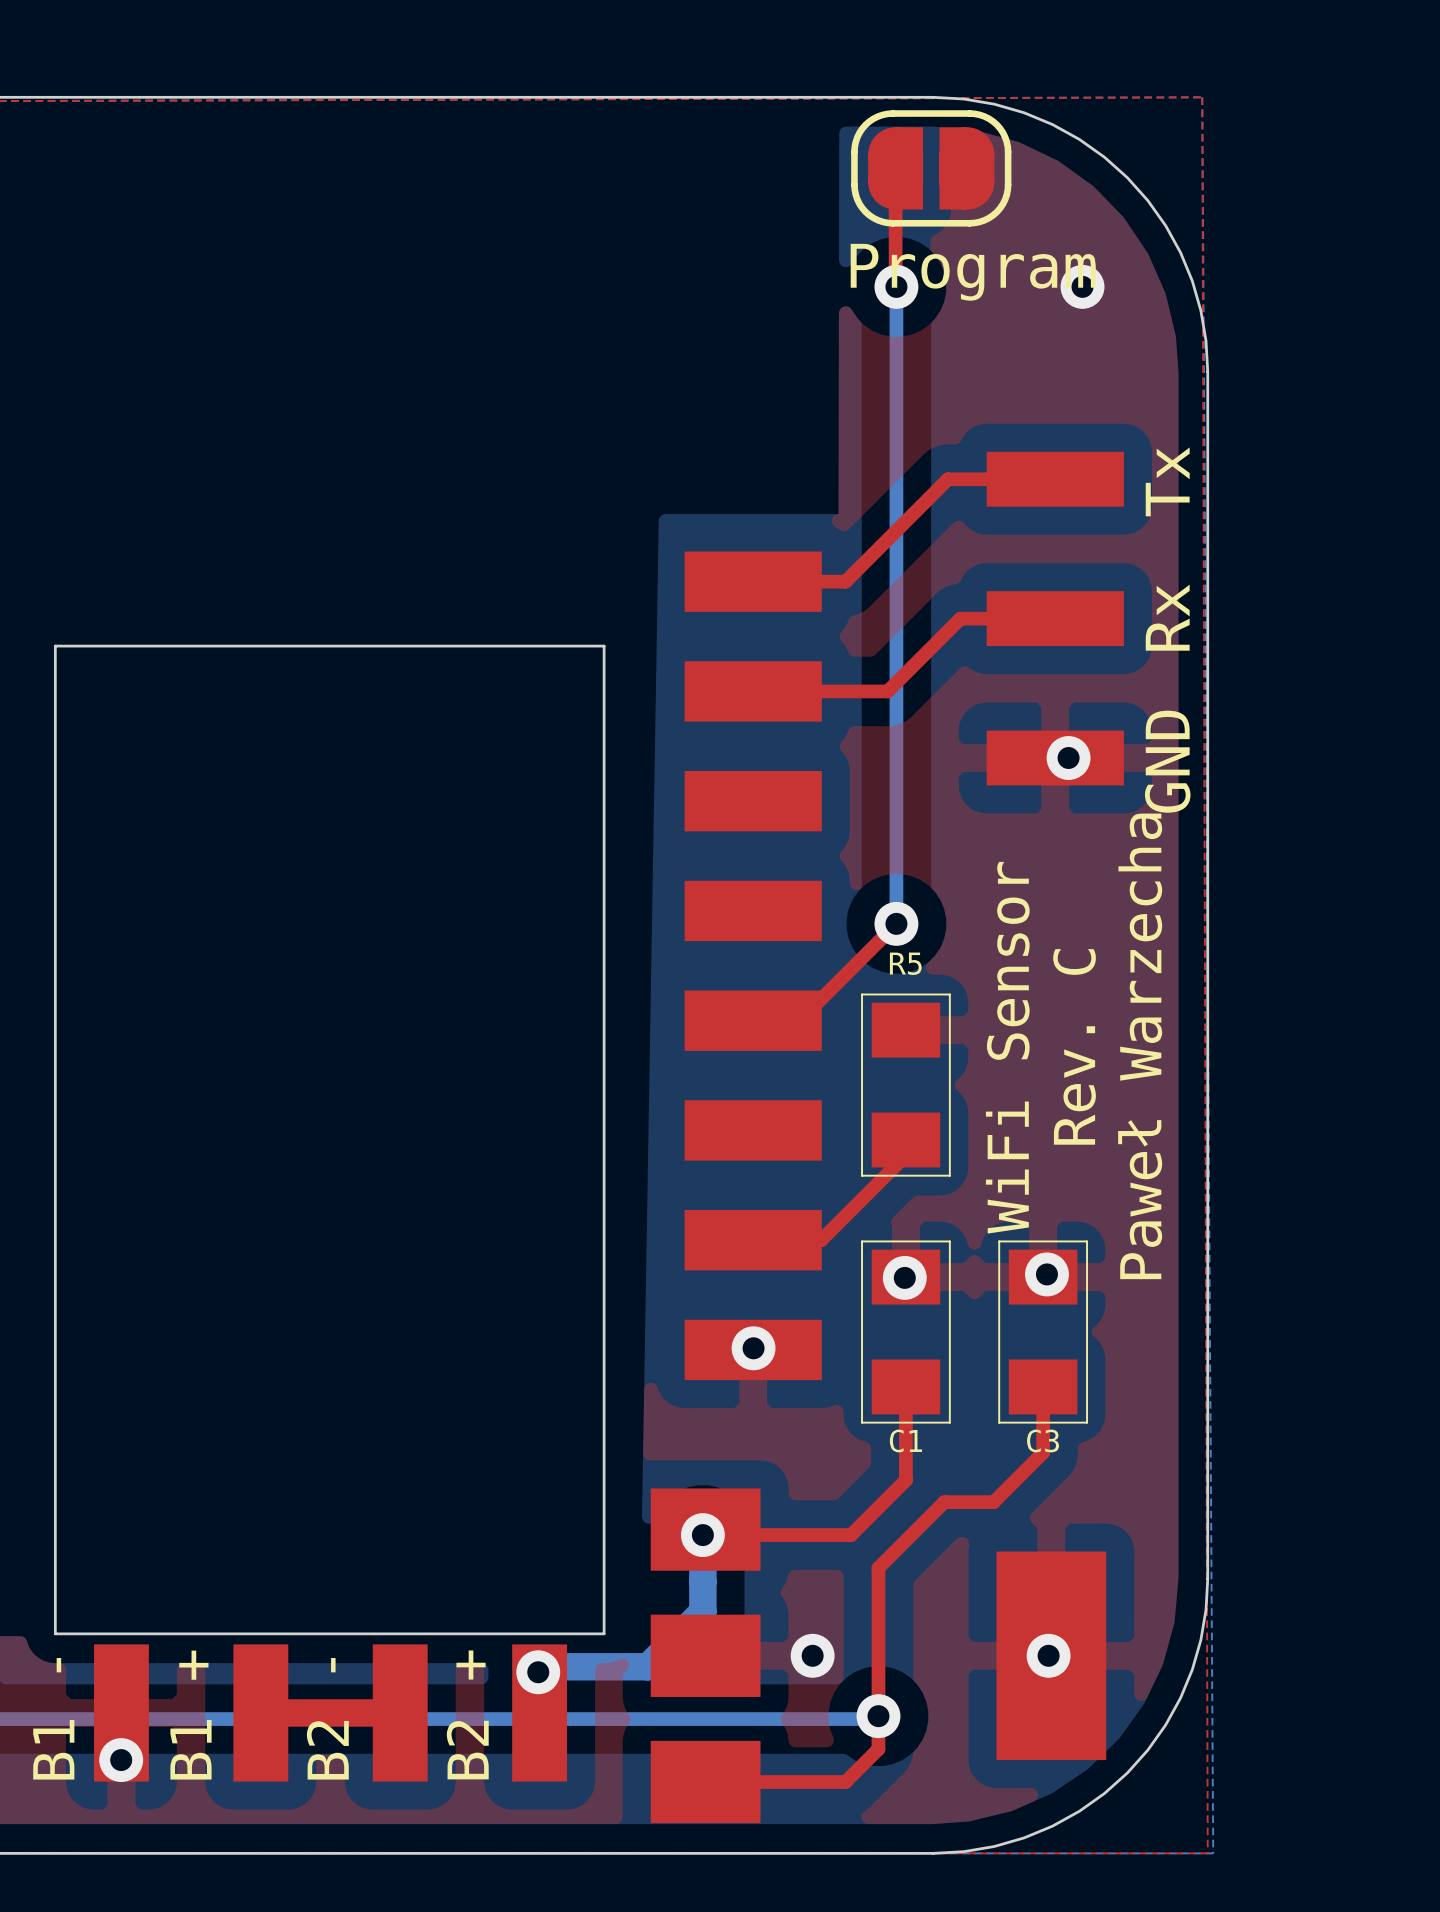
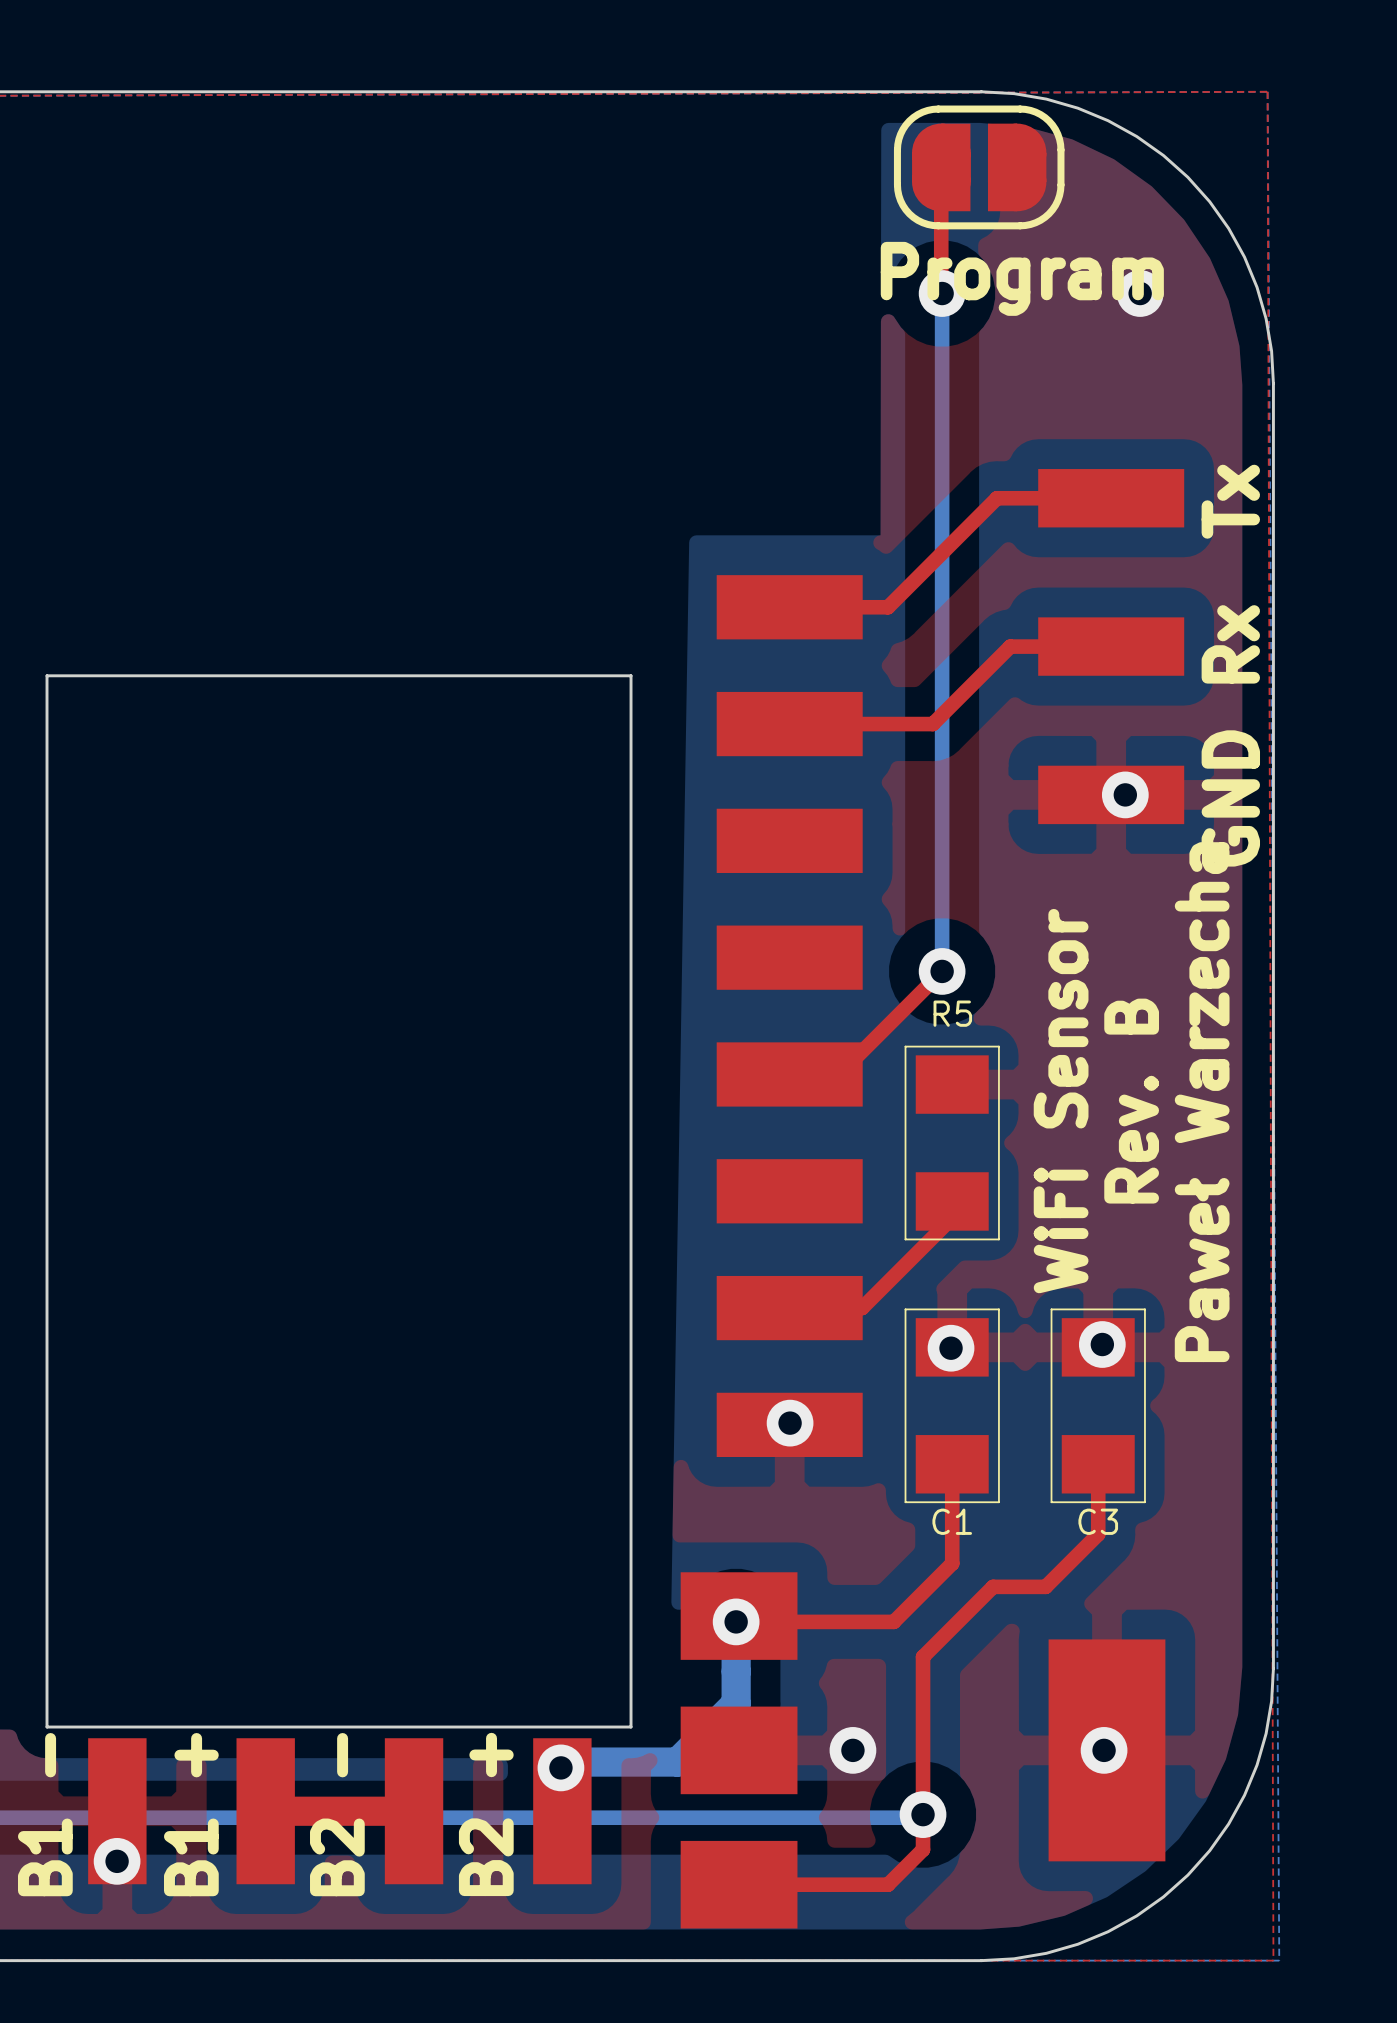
text: Rev. C (1074, 1046) -> Rev. B (1131, 1101)

